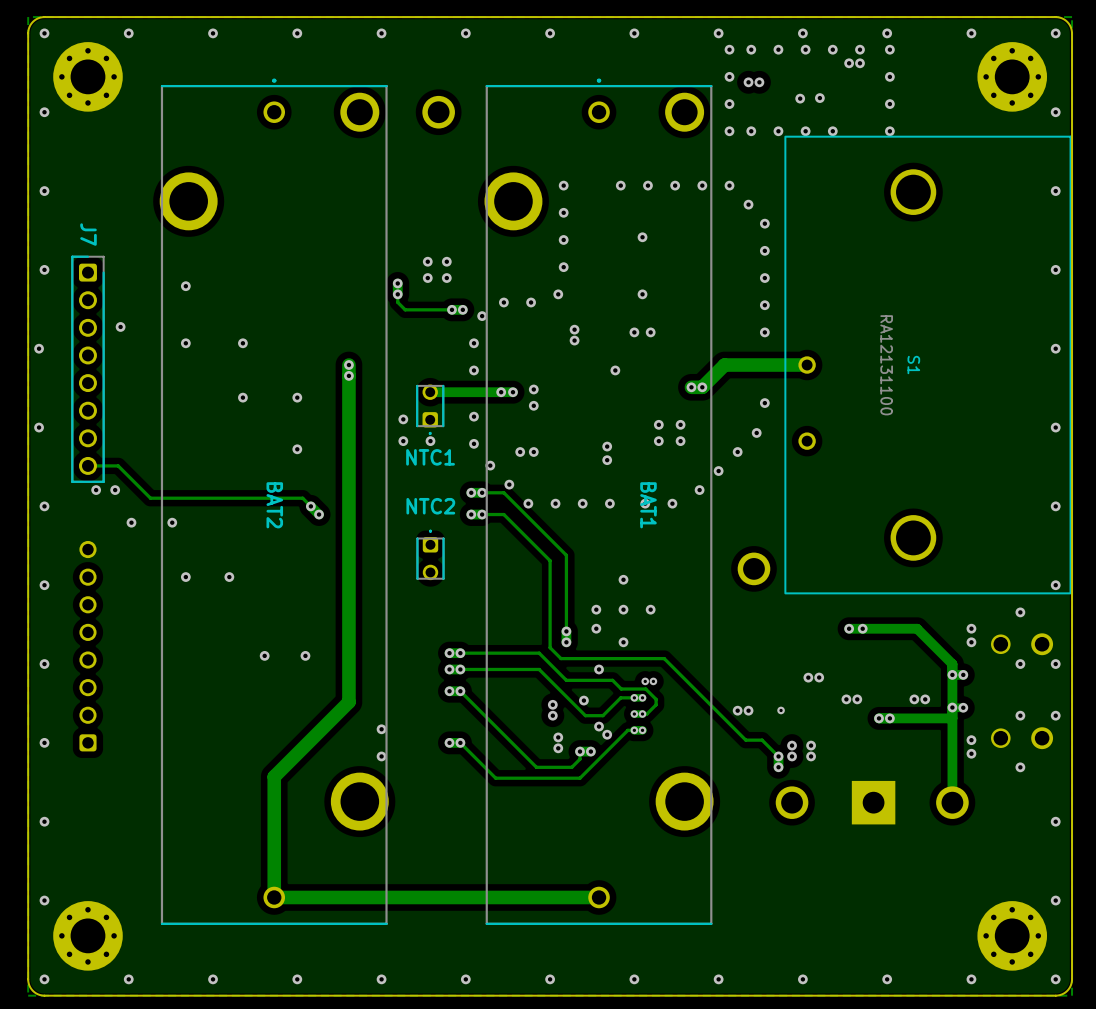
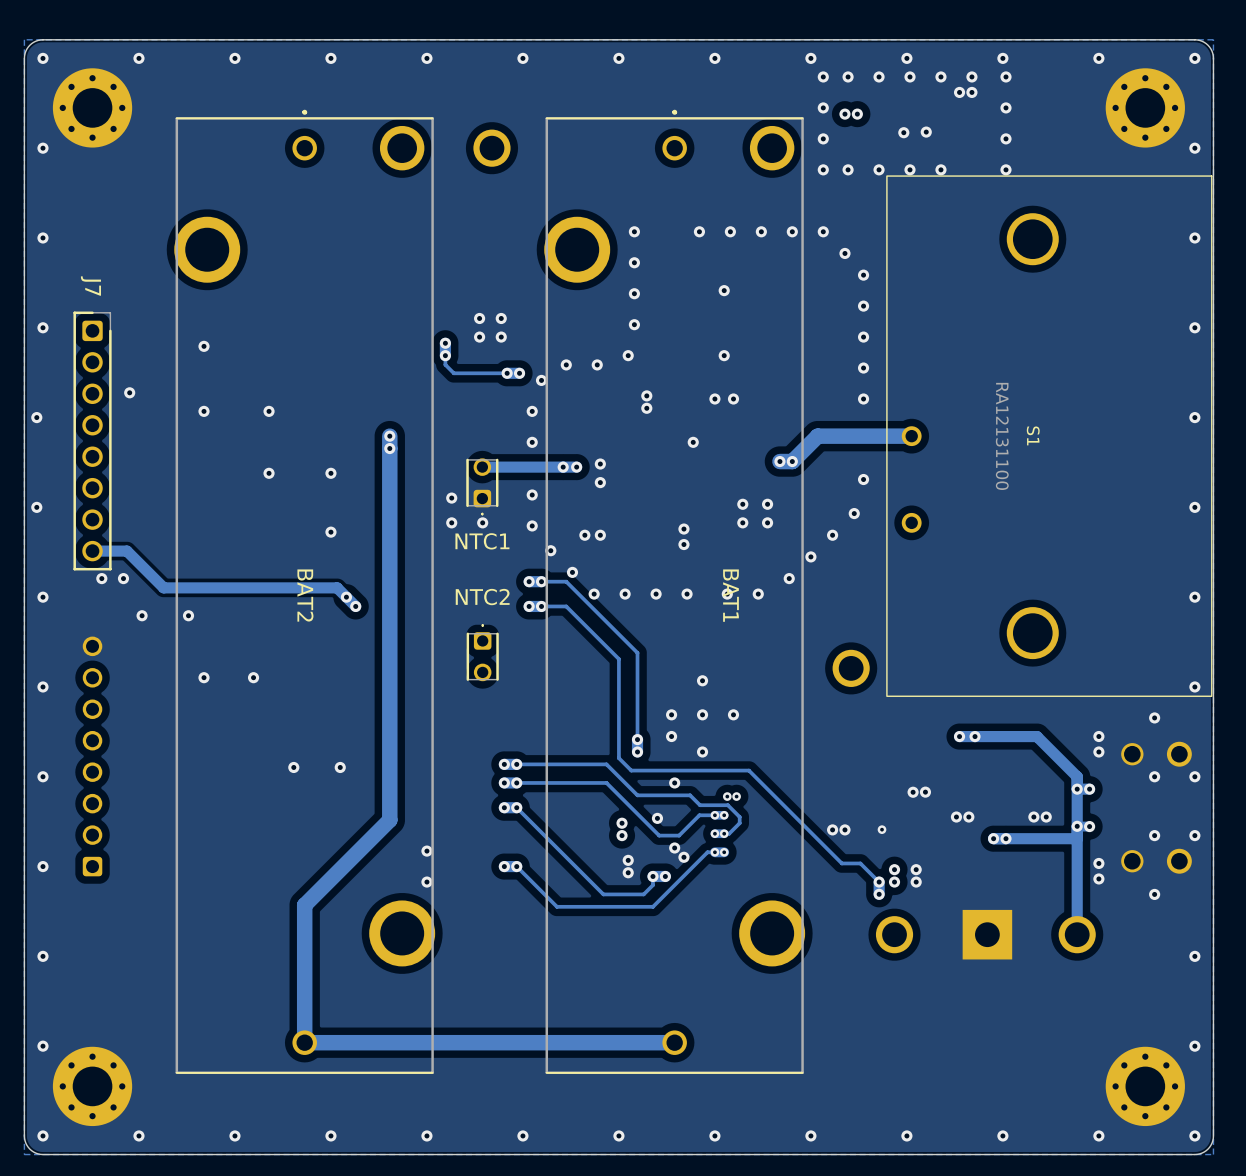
track width: thin (87, 465) (118, 465) (150, 498) (302, 498) (310, 506) -> thick (92, 551) (126, 551) (163, 587) (337, 587) (346, 597)

